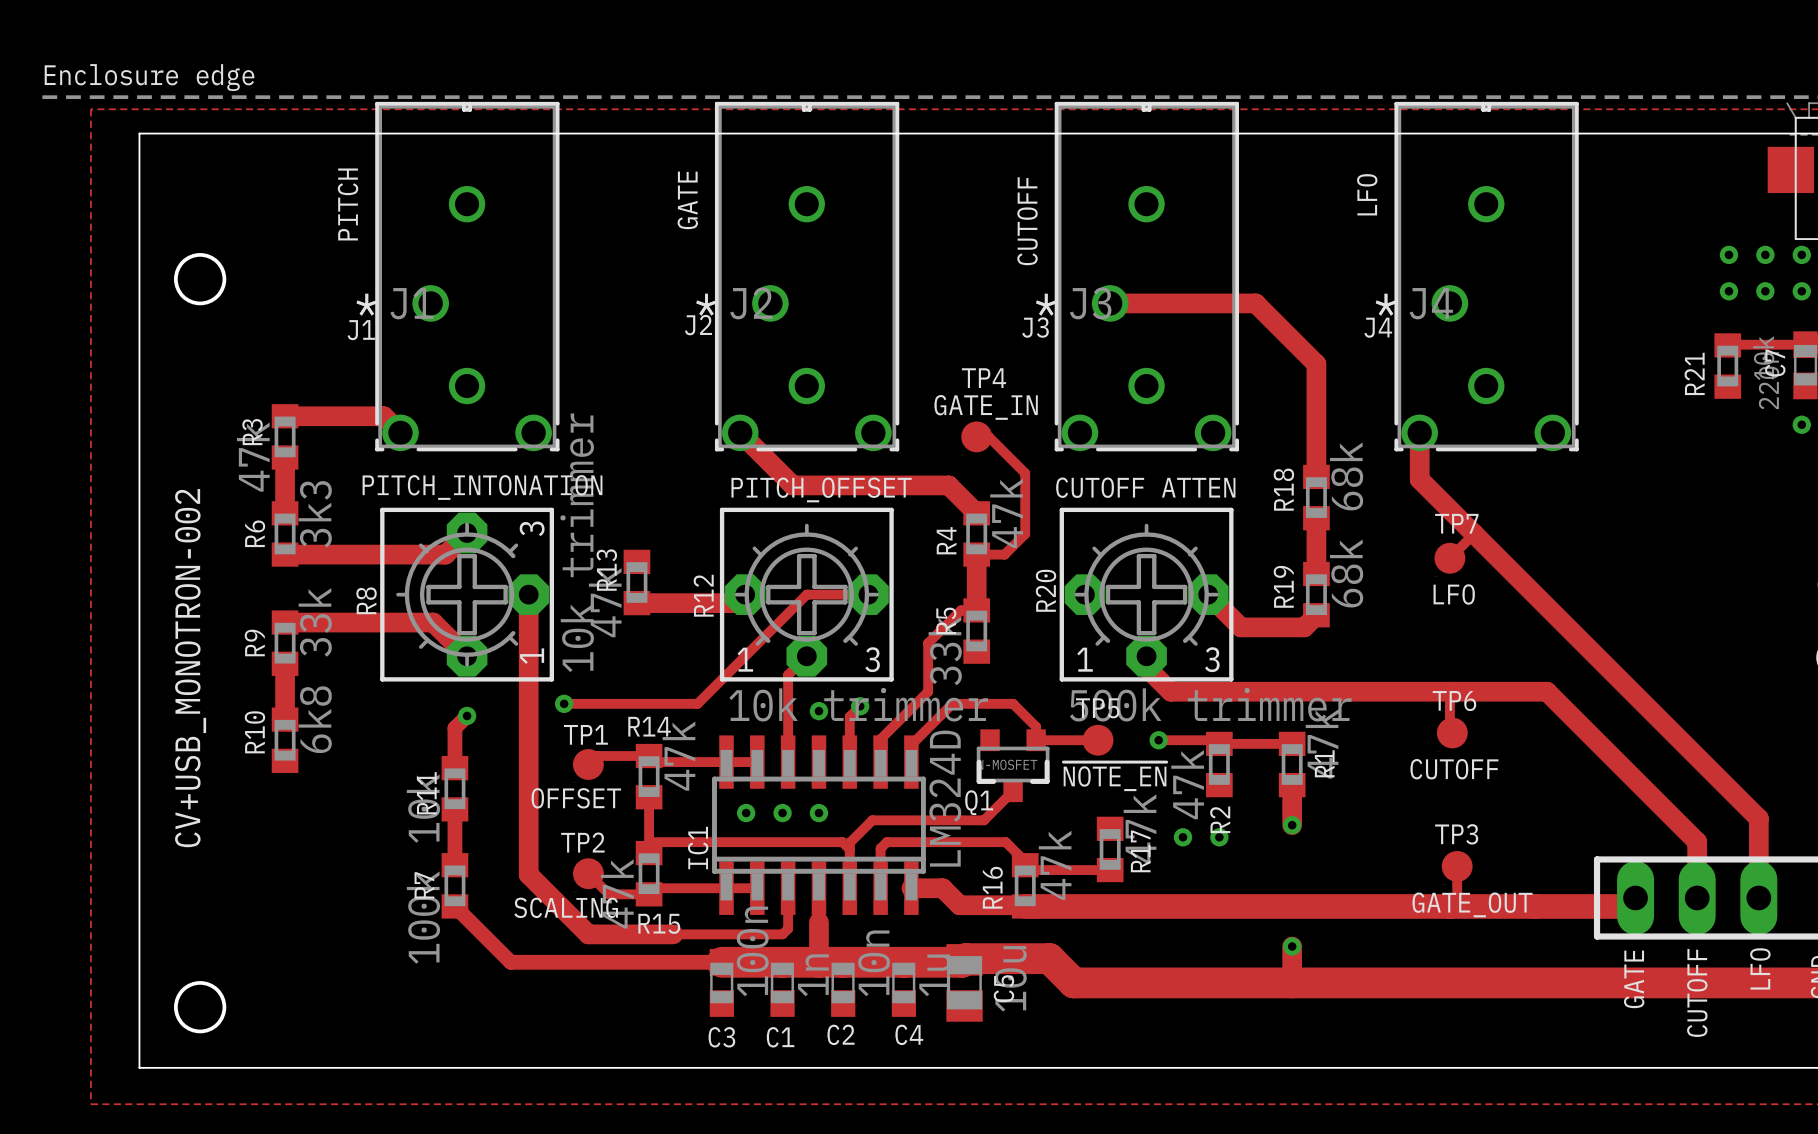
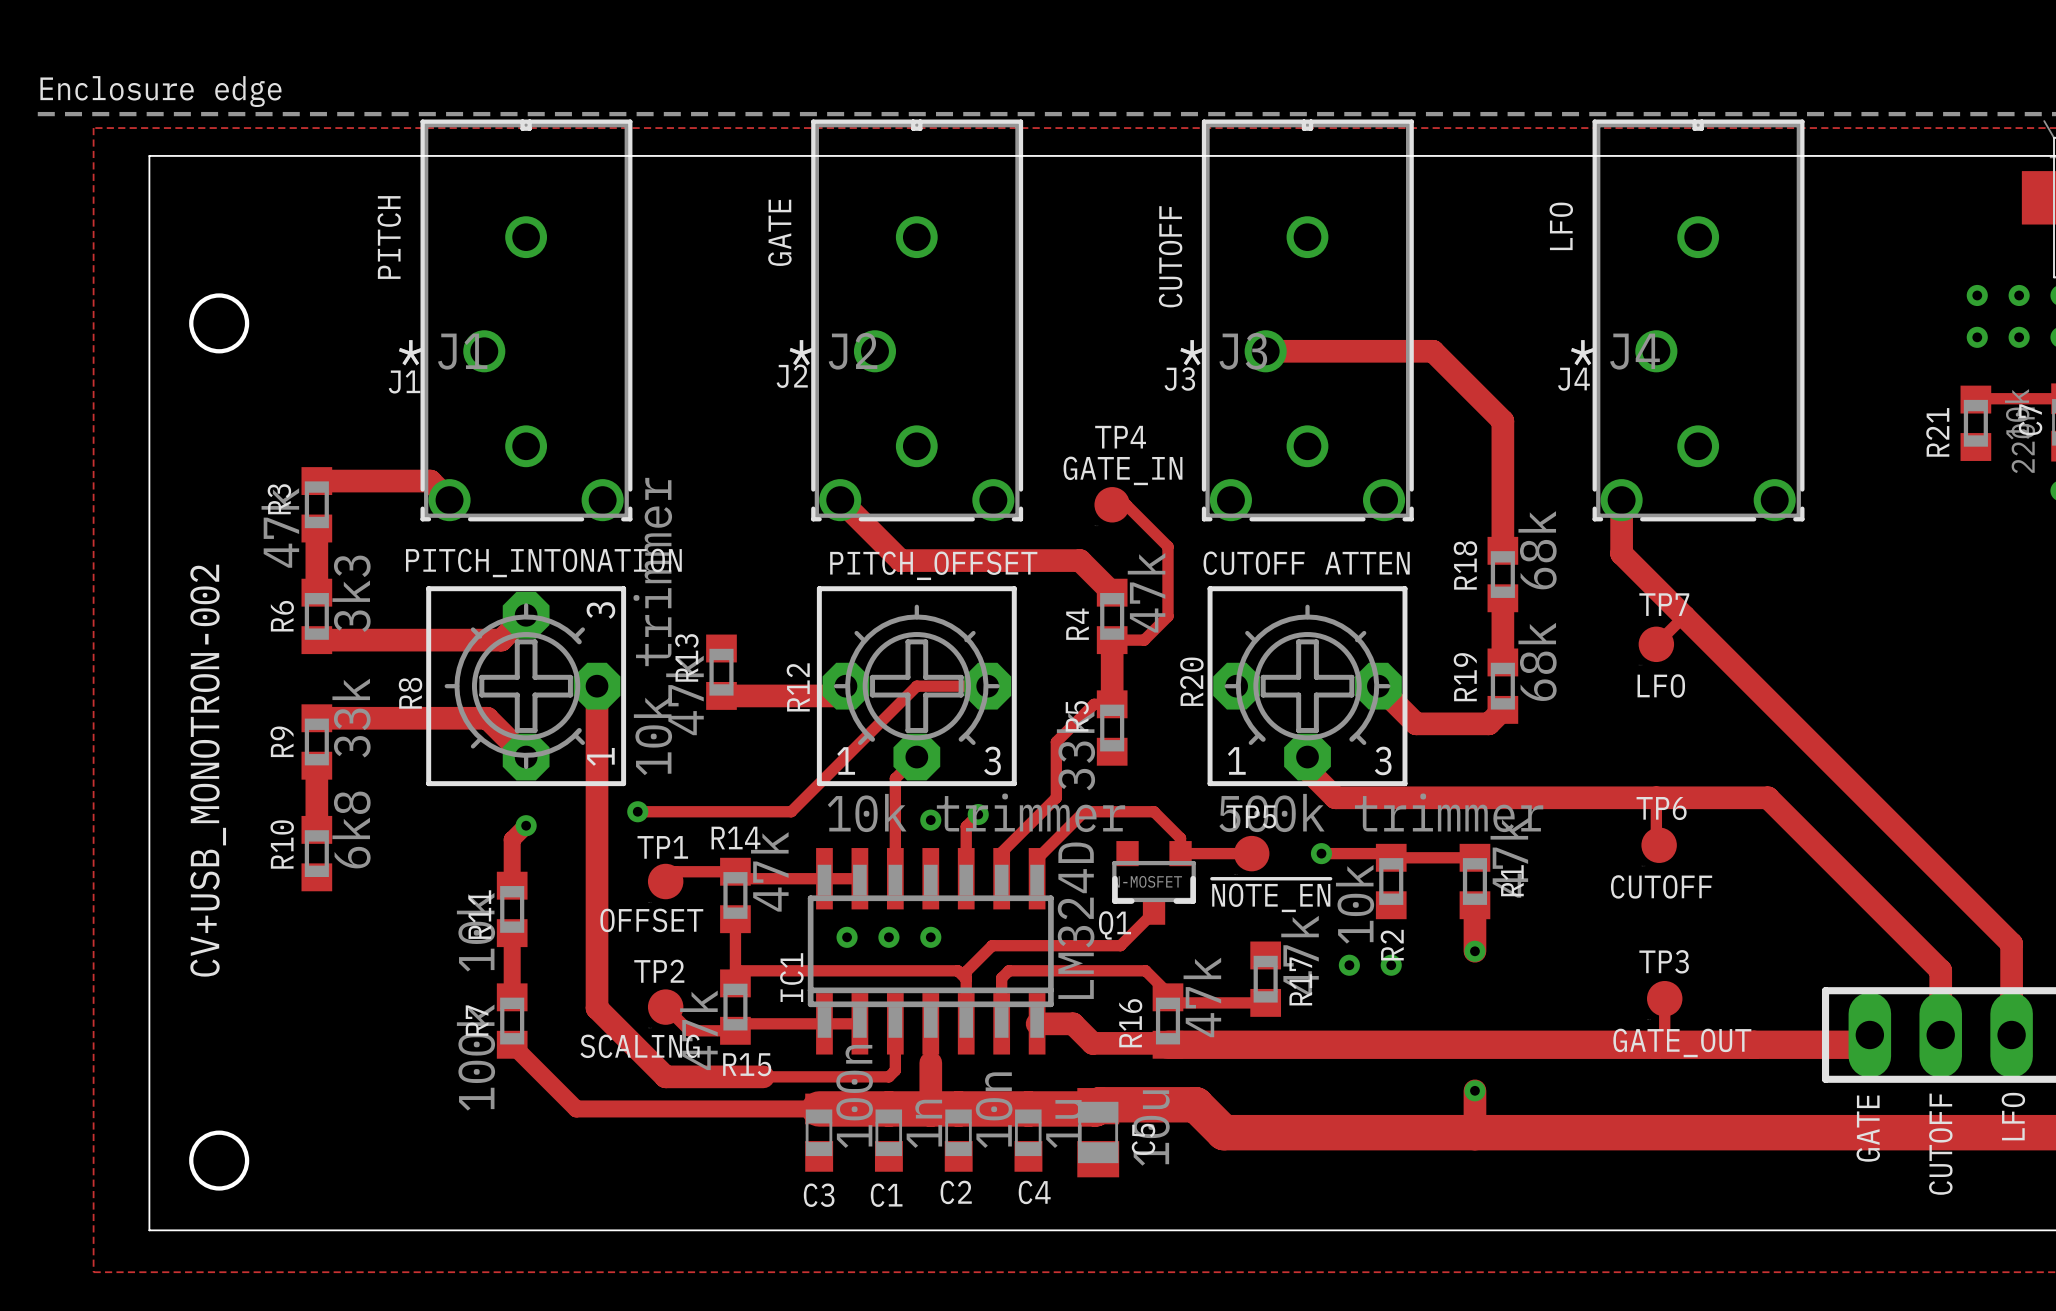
R2 value: 47k (1187, 784) -> 10k (1355, 904)

